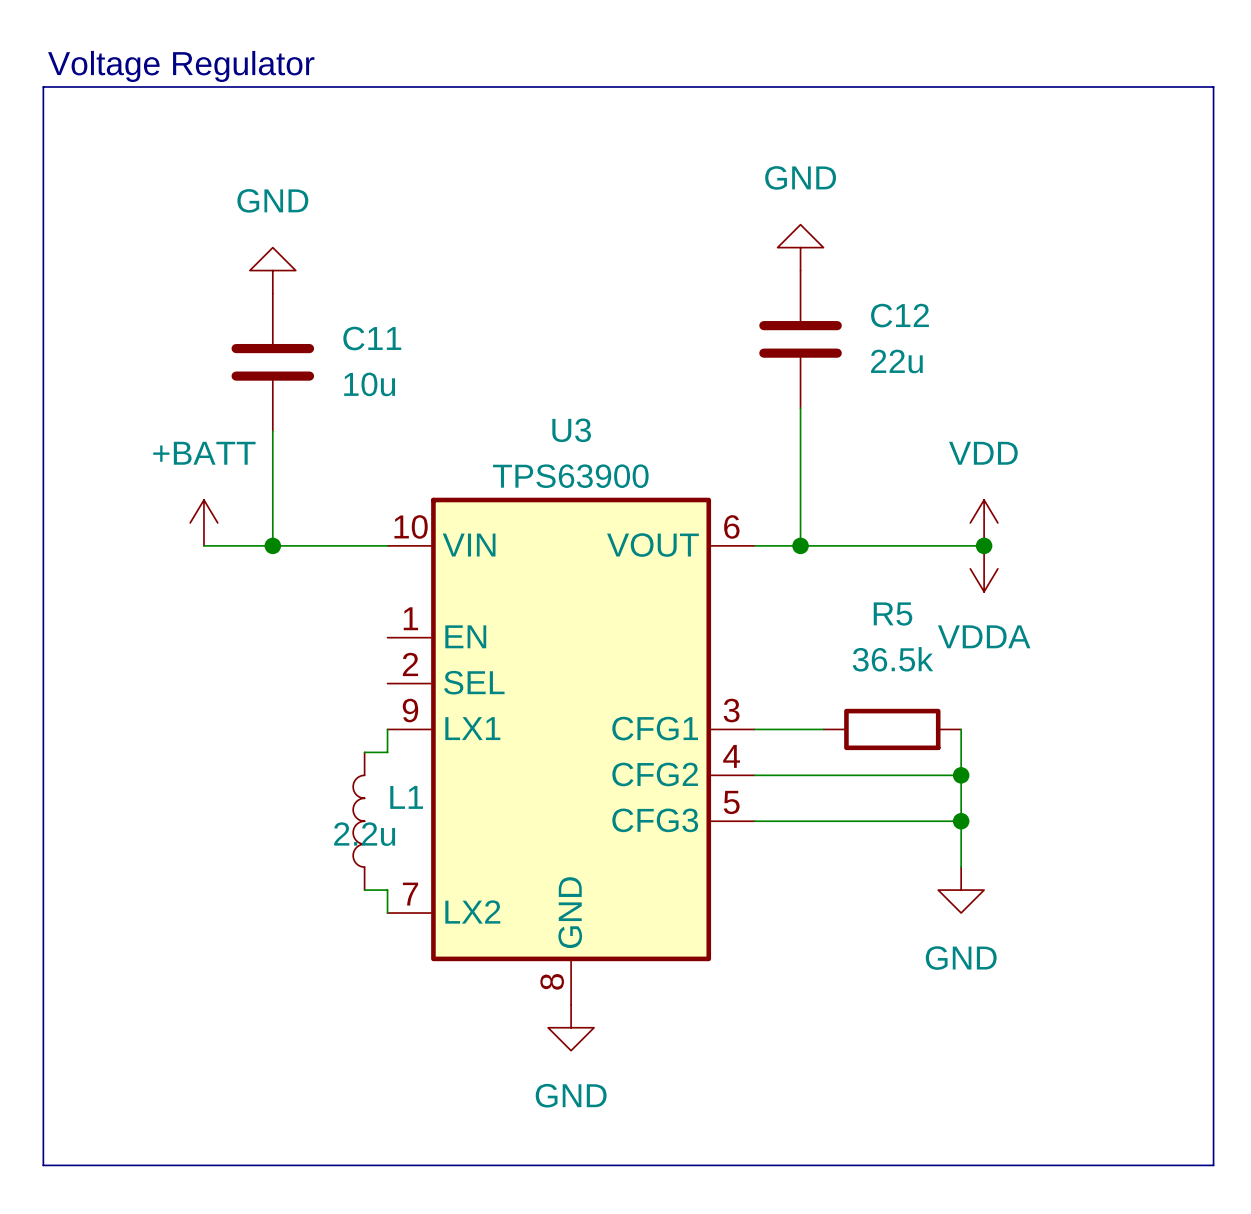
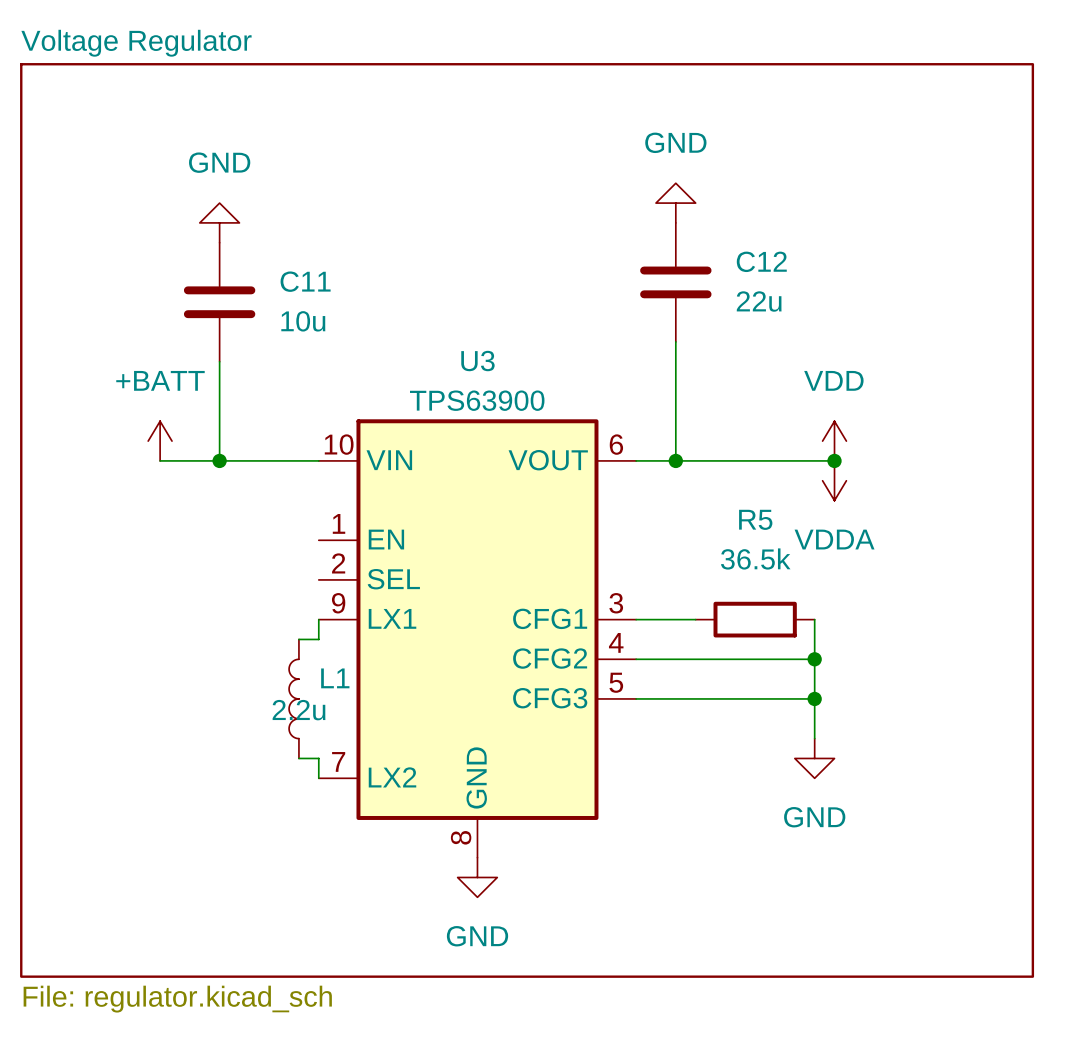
text: Voltage Regulator (181, 66) -> none
line: (43, 86) (1213, 86) (1213, 1165) (43, 1165) (43, 86) -> none
sheet Voltage Regulator: none -> File: regulator.kicad_sch (527, 520)

